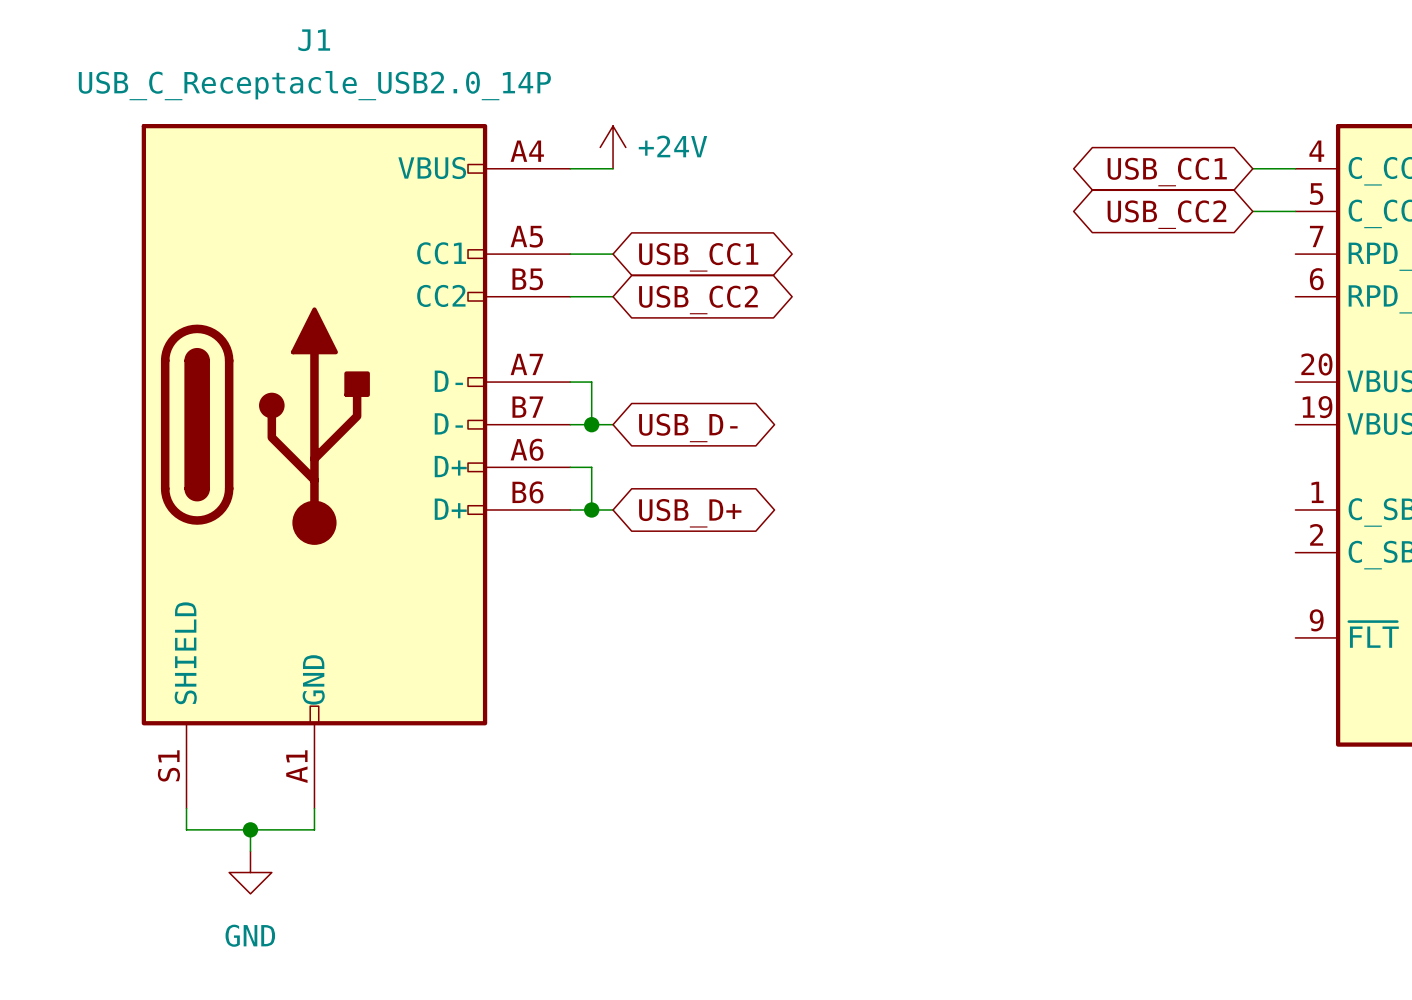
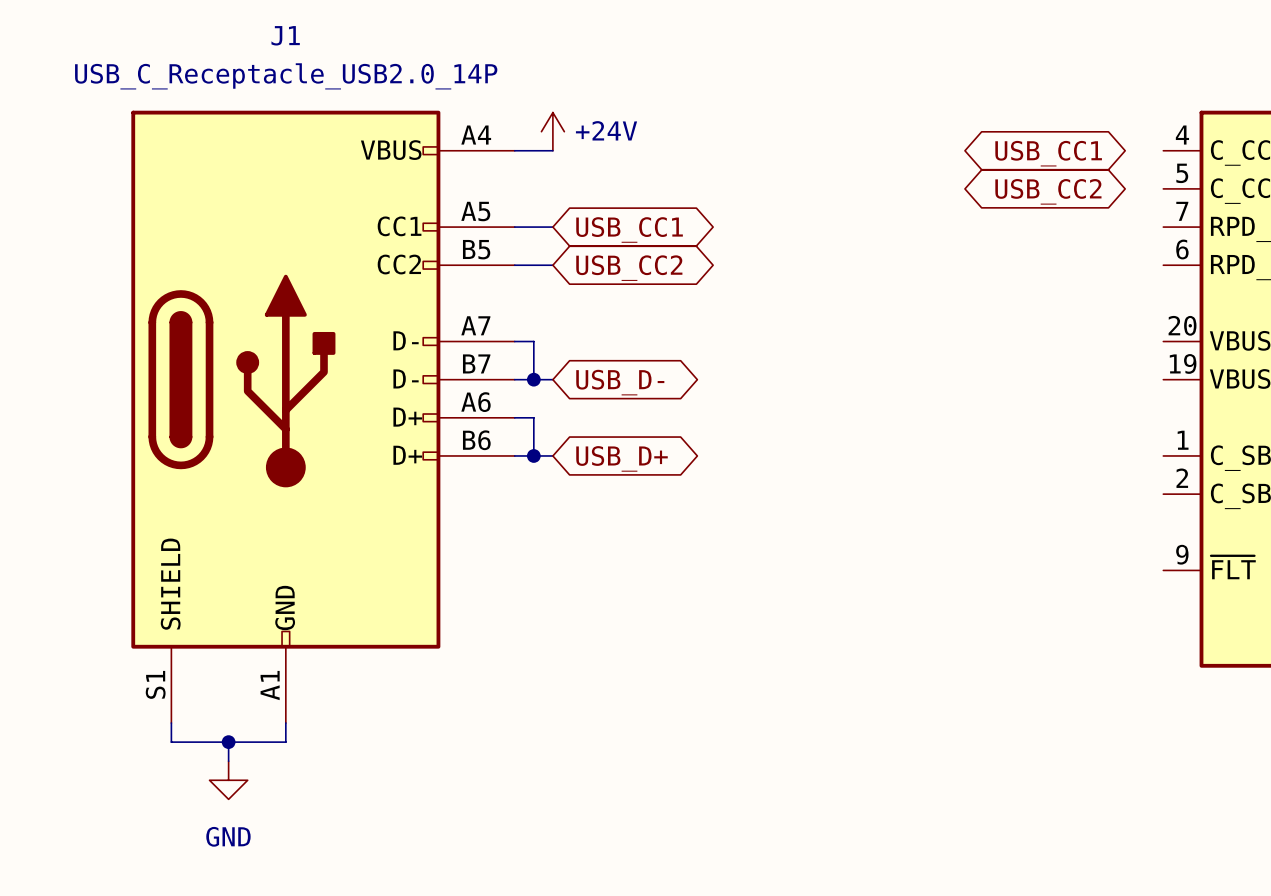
wire: (1252, 168) (1295, 168) -> none
wire: (1252, 211) (1295, 211) -> none

